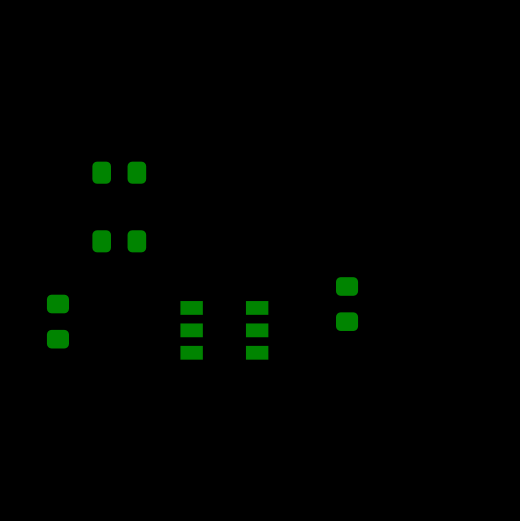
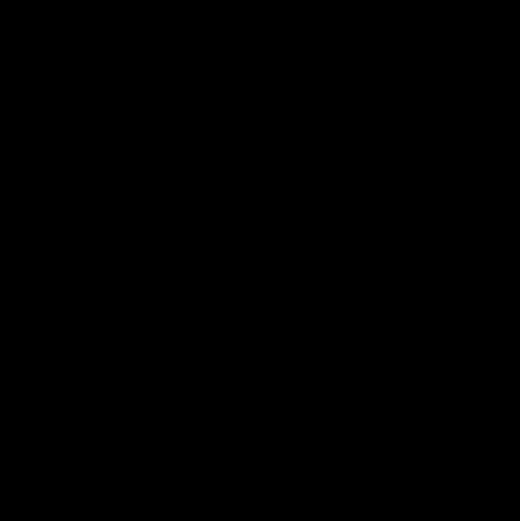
part: (119, 172) -> none
part: (119, 241) -> none
part: (347, 304) -> none
part: (57, 321) -> none
part: (224, 330) -> none

